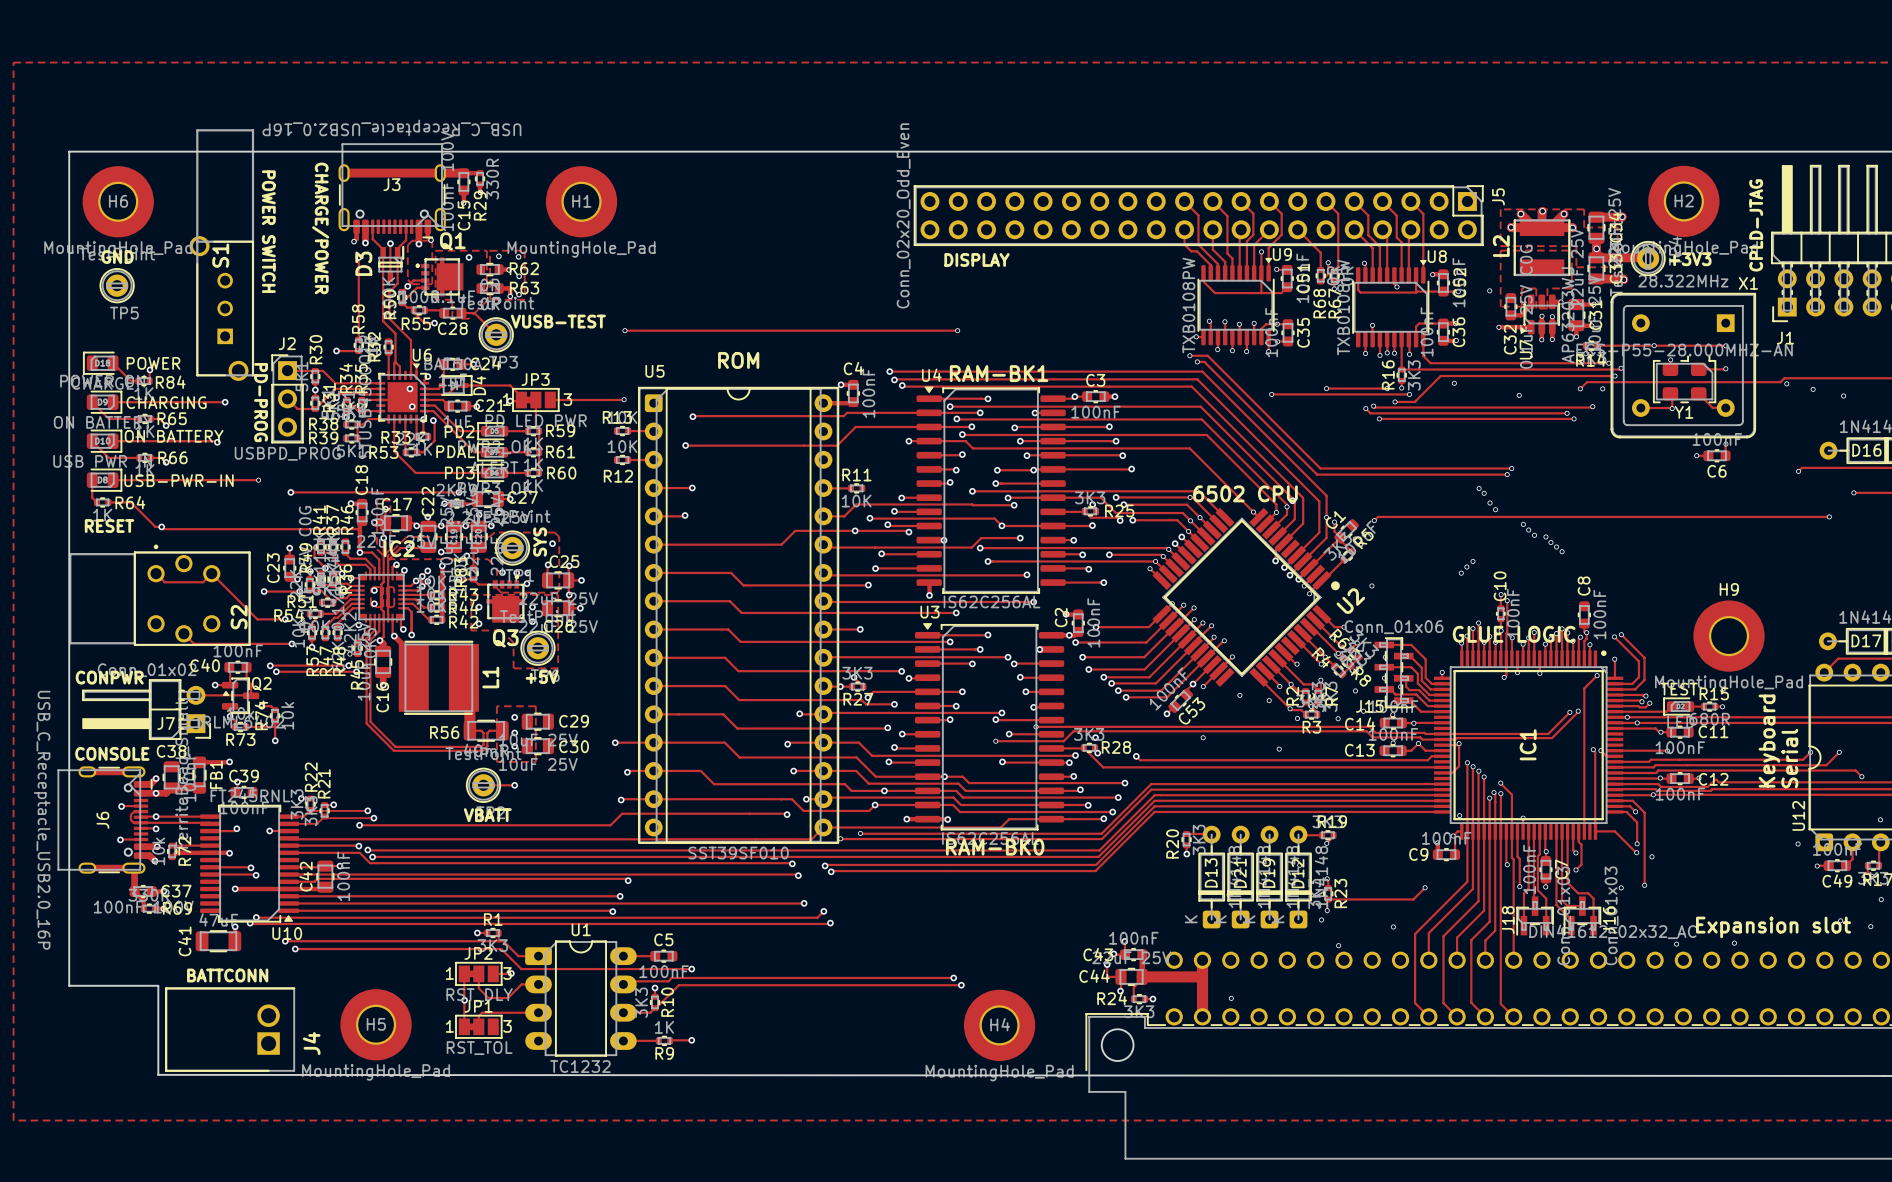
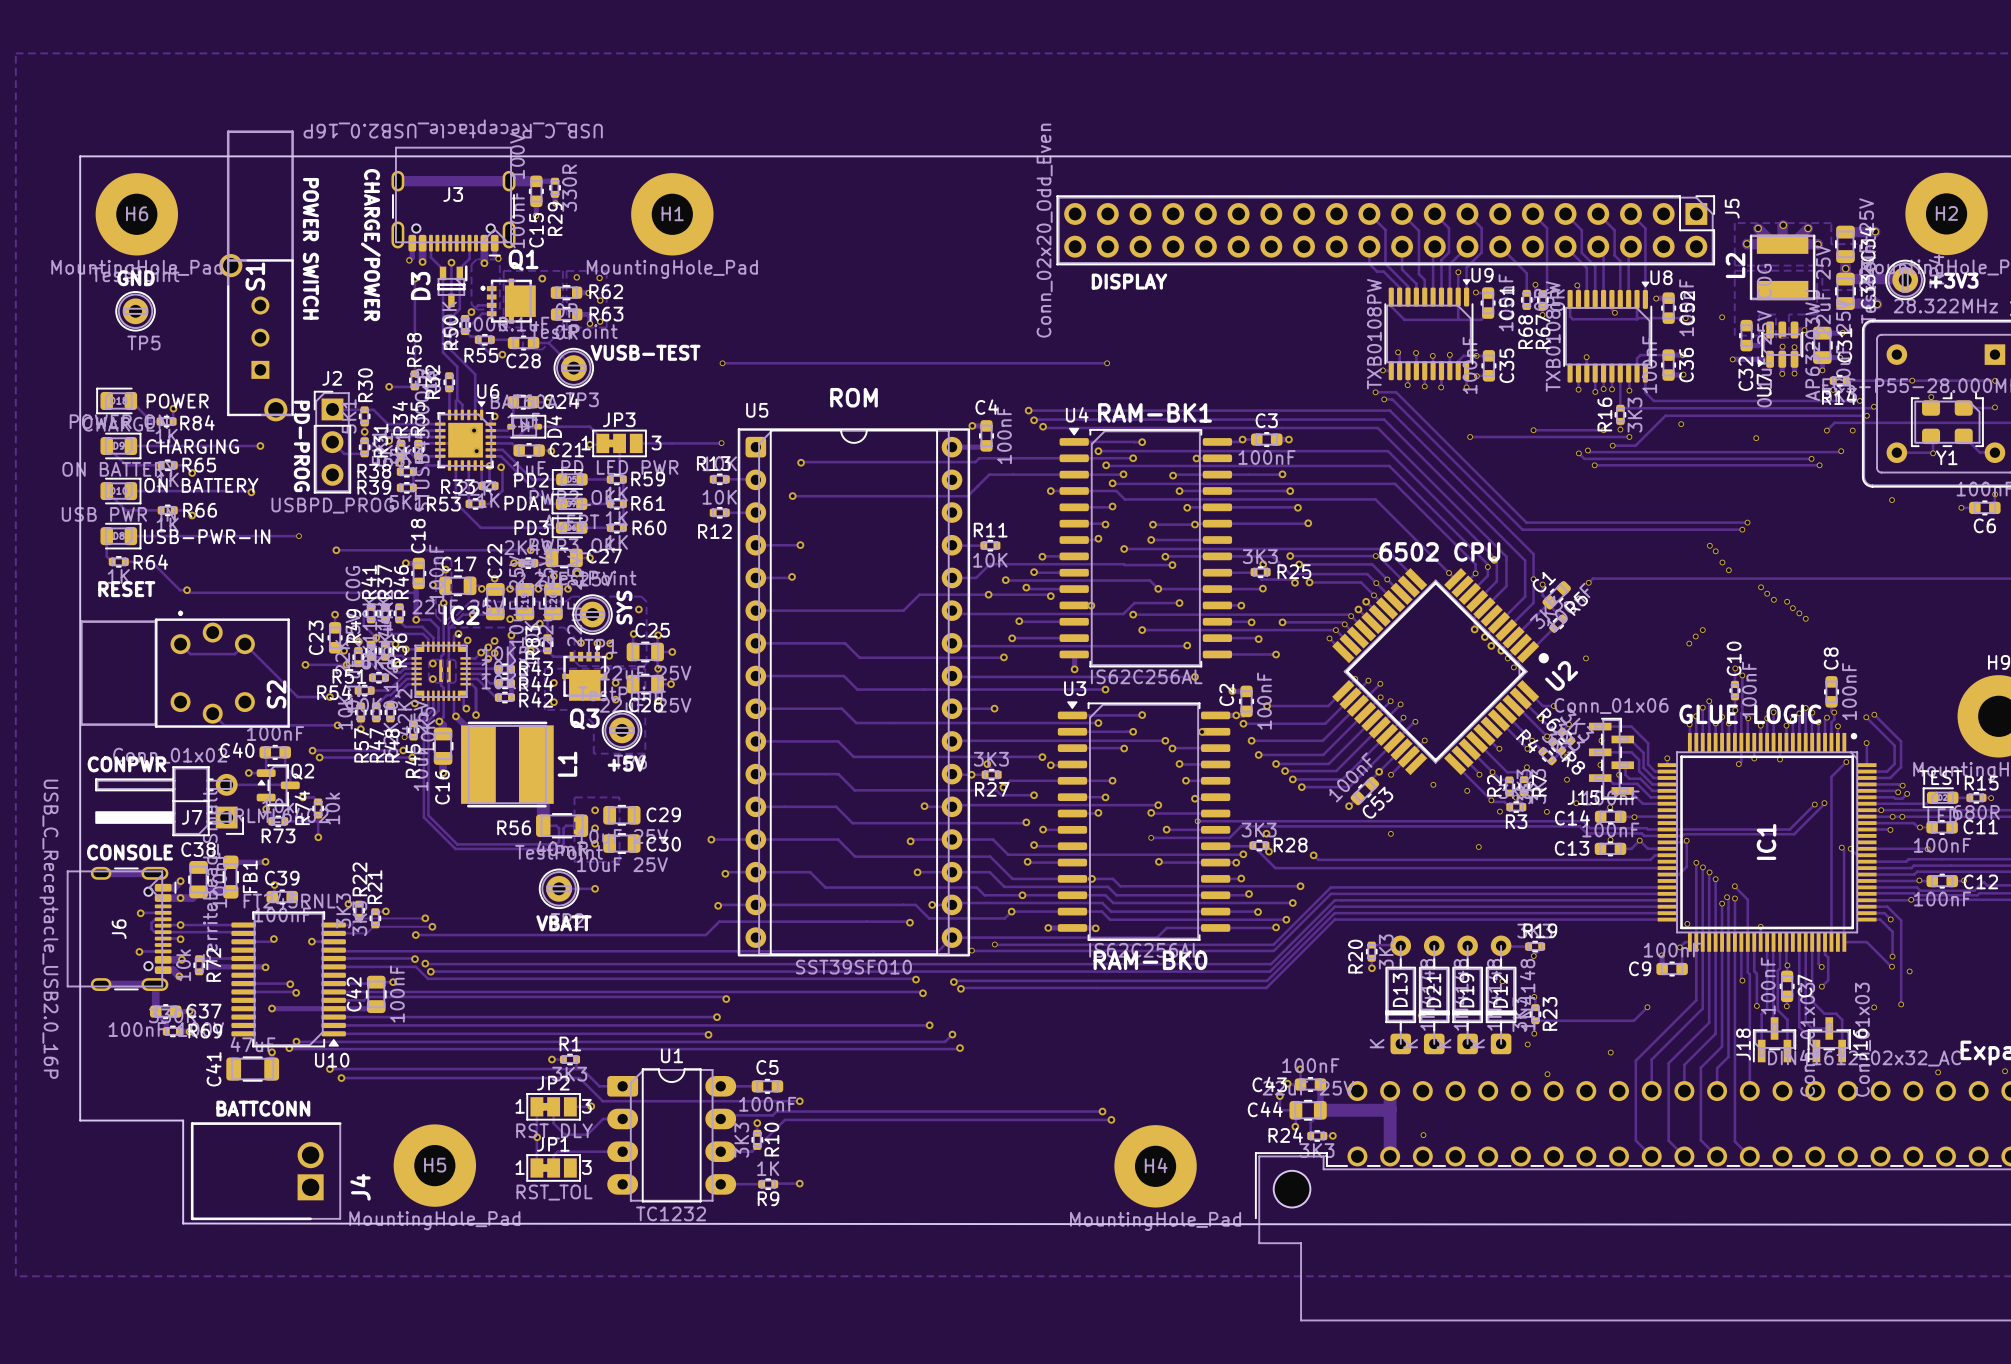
via: none -> (1892, 500)
via: none -> (1902, 816)
track: none -> (1866, 829) (1890, 829)
via: none -> (1890, 829)

